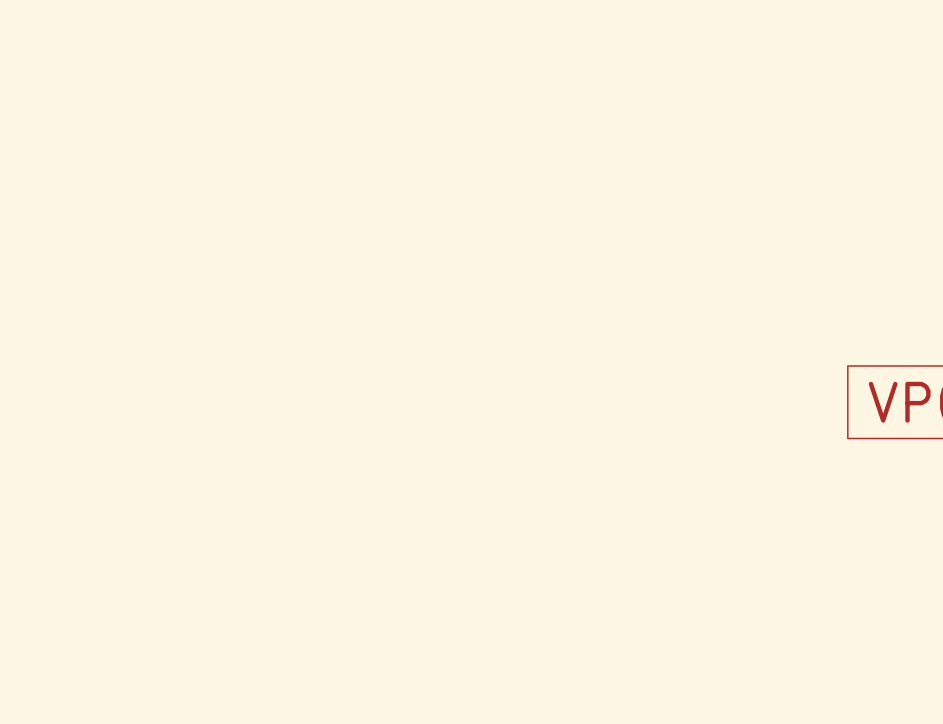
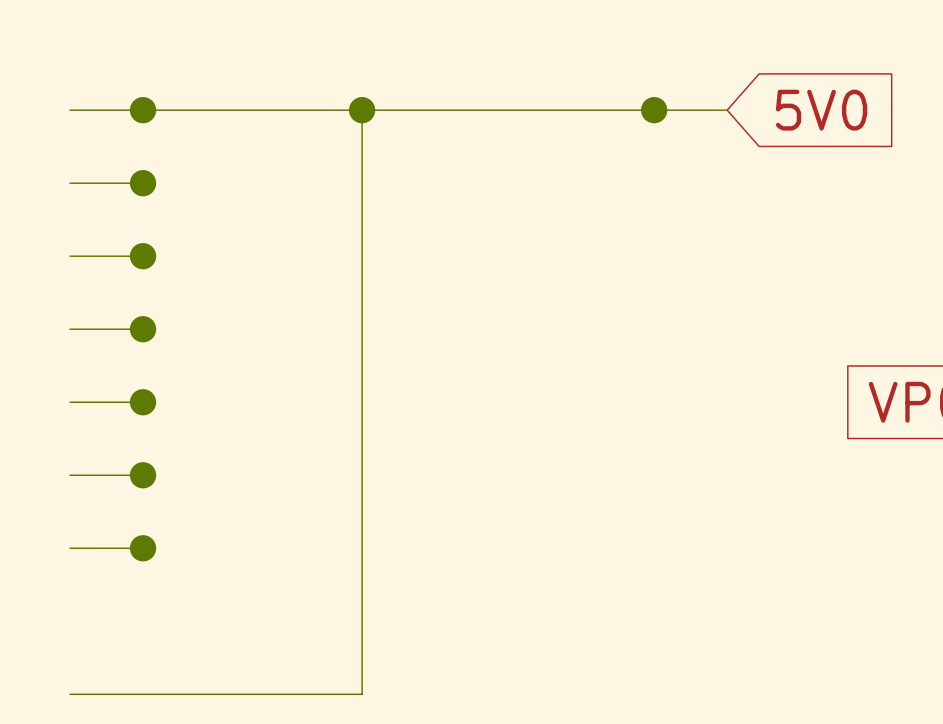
wire: none -> (70, 110) (727, 110)
junction: none -> (143, 110)
wire: none -> (362, 110) (362, 694) (70, 694)
junction: none -> (362, 110)
junction: none -> (654, 110)
global label: none -> 5V0 (821, 110)
wire: none -> (70, 183) (143, 183)
junction: none -> (143, 183)
wire: none -> (70, 256) (143, 256)
junction: none -> (143, 256)
wire: none -> (70, 329) (143, 329)
junction: none -> (143, 329)
wire: none -> (70, 402) (143, 402)
junction: none -> (143, 402)
wire: none -> (70, 475) (143, 475)
junction: none -> (143, 475)
wire: none -> (70, 548) (143, 548)
junction: none -> (143, 548)

